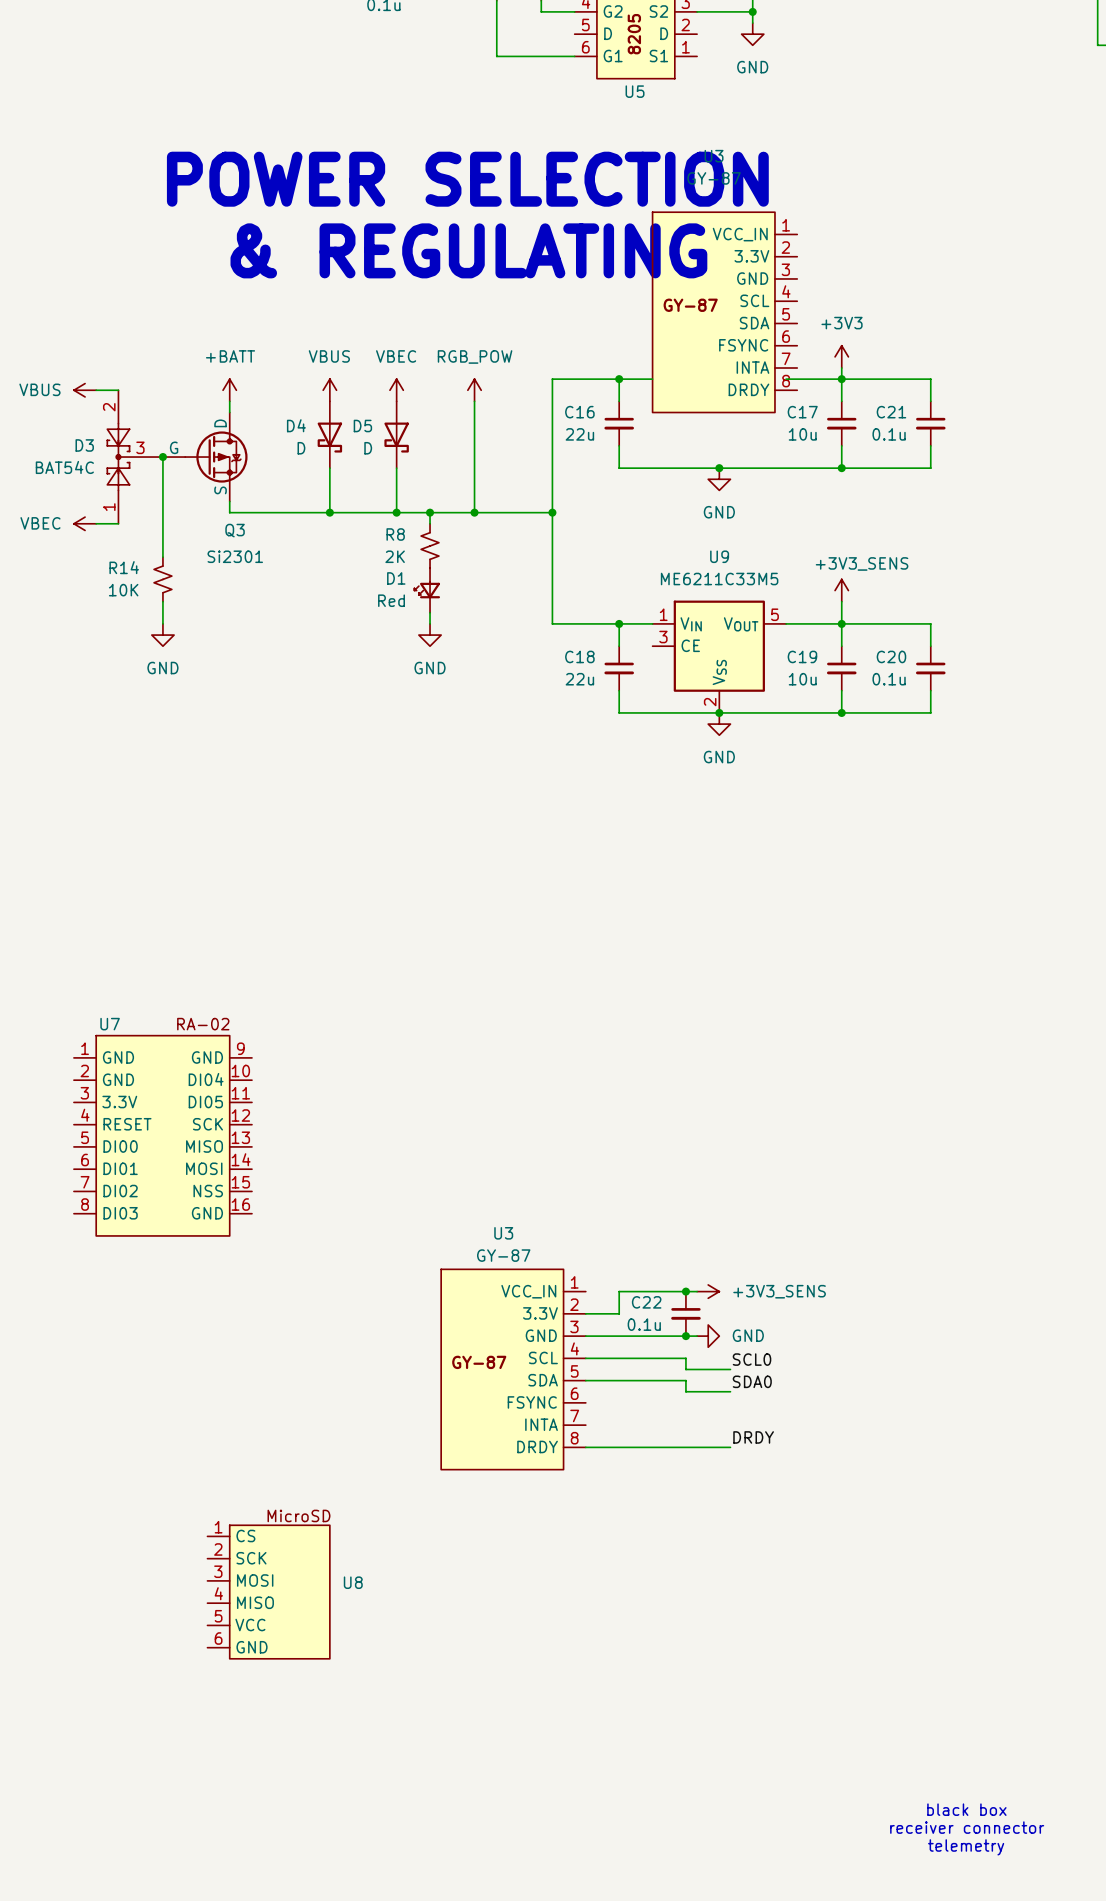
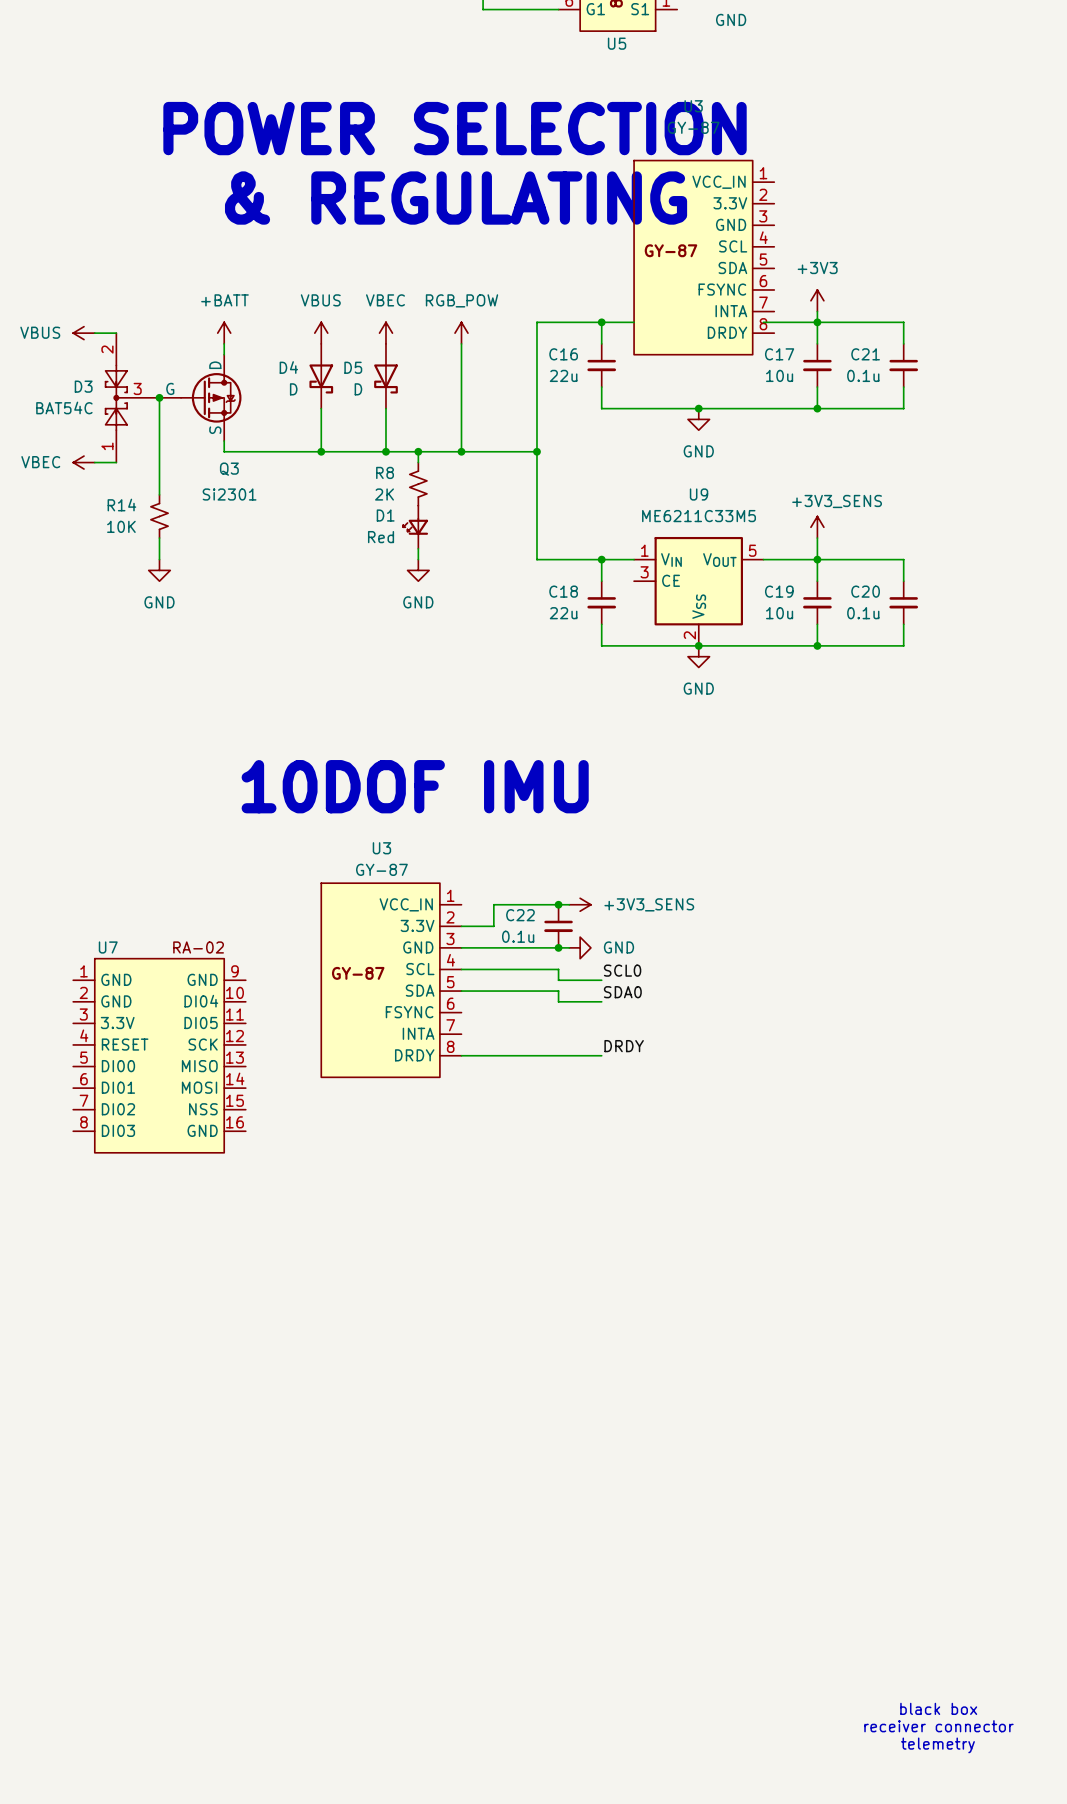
text: none -> 10DOF IMU (415, 786)
junction: none -> (558, 904)
wire: none -> (569, 904) (493, 904) (493, 926) (461, 926)
power symbol: none -> +3V3_SENS (580, 904)
wire: none -> (461, 947) (569, 947)
junction: none -> (558, 947)
power symbol: none -> GND (580, 947)
wire: none -> (461, 969) (558, 969) (558, 980) (601, 980)
label: none -> SCL0 (622, 970)
U3: none -> GY-87 (391, 980)
wire: none -> (461, 991) (558, 991) (558, 1001) (601, 1001)
label: none -> SDA0 (622, 992)
label: none -> DRDY (624, 1046)
wire: none -> (461, 1055) (601, 1055)
junction: (685, 1291) -> none
wire: (697, 1291) (619, 1291) (619, 1313) (585, 1313) -> none
power symbol: +3V3_SENS (708, 1291) -> none
C22 position: (685, 1313) -> (558, 926)
wire: (585, 1336) (697, 1336) -> none
junction: (685, 1336) -> none
power symbol: GND (708, 1336) -> none
wire: (585, 1358) (685, 1358) (685, 1369) (730, 1369) -> none
label: SCL0 (752, 1359) -> none
U3: GY-87 (513, 1369) -> none
wire: (585, 1380) (685, 1380) (685, 1391) (730, 1391) -> none
label: SDA0 (752, 1381) -> none
label: DRDY (753, 1437) -> none
wire: (585, 1447) (730, 1447) -> none
U8: (268, 1592) -> none

